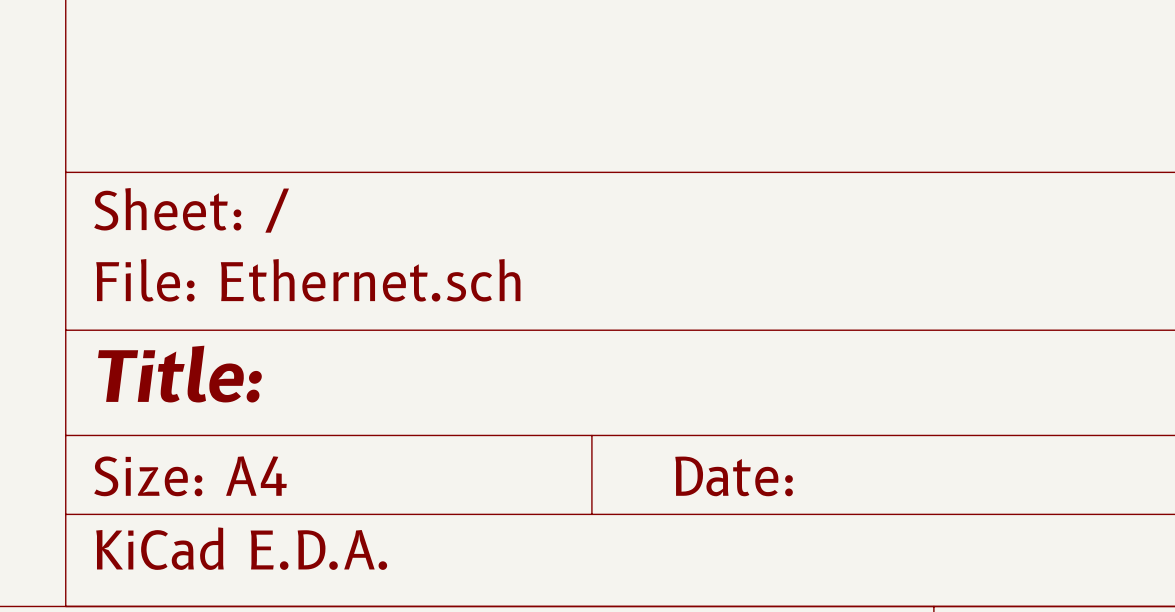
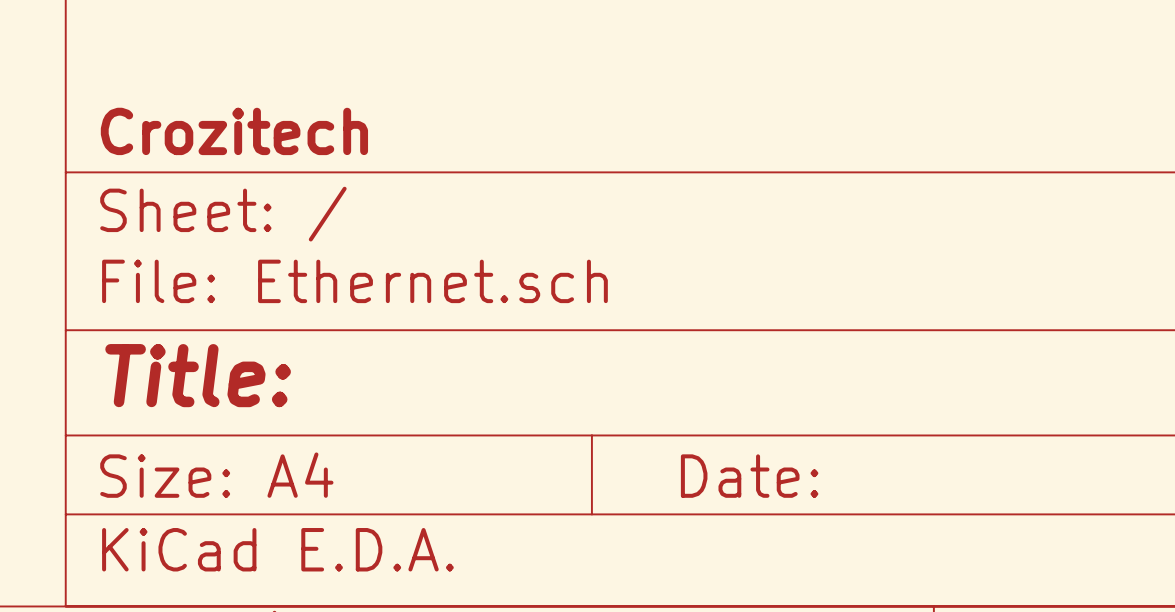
title block: none -> Crozitech (234, 131)

